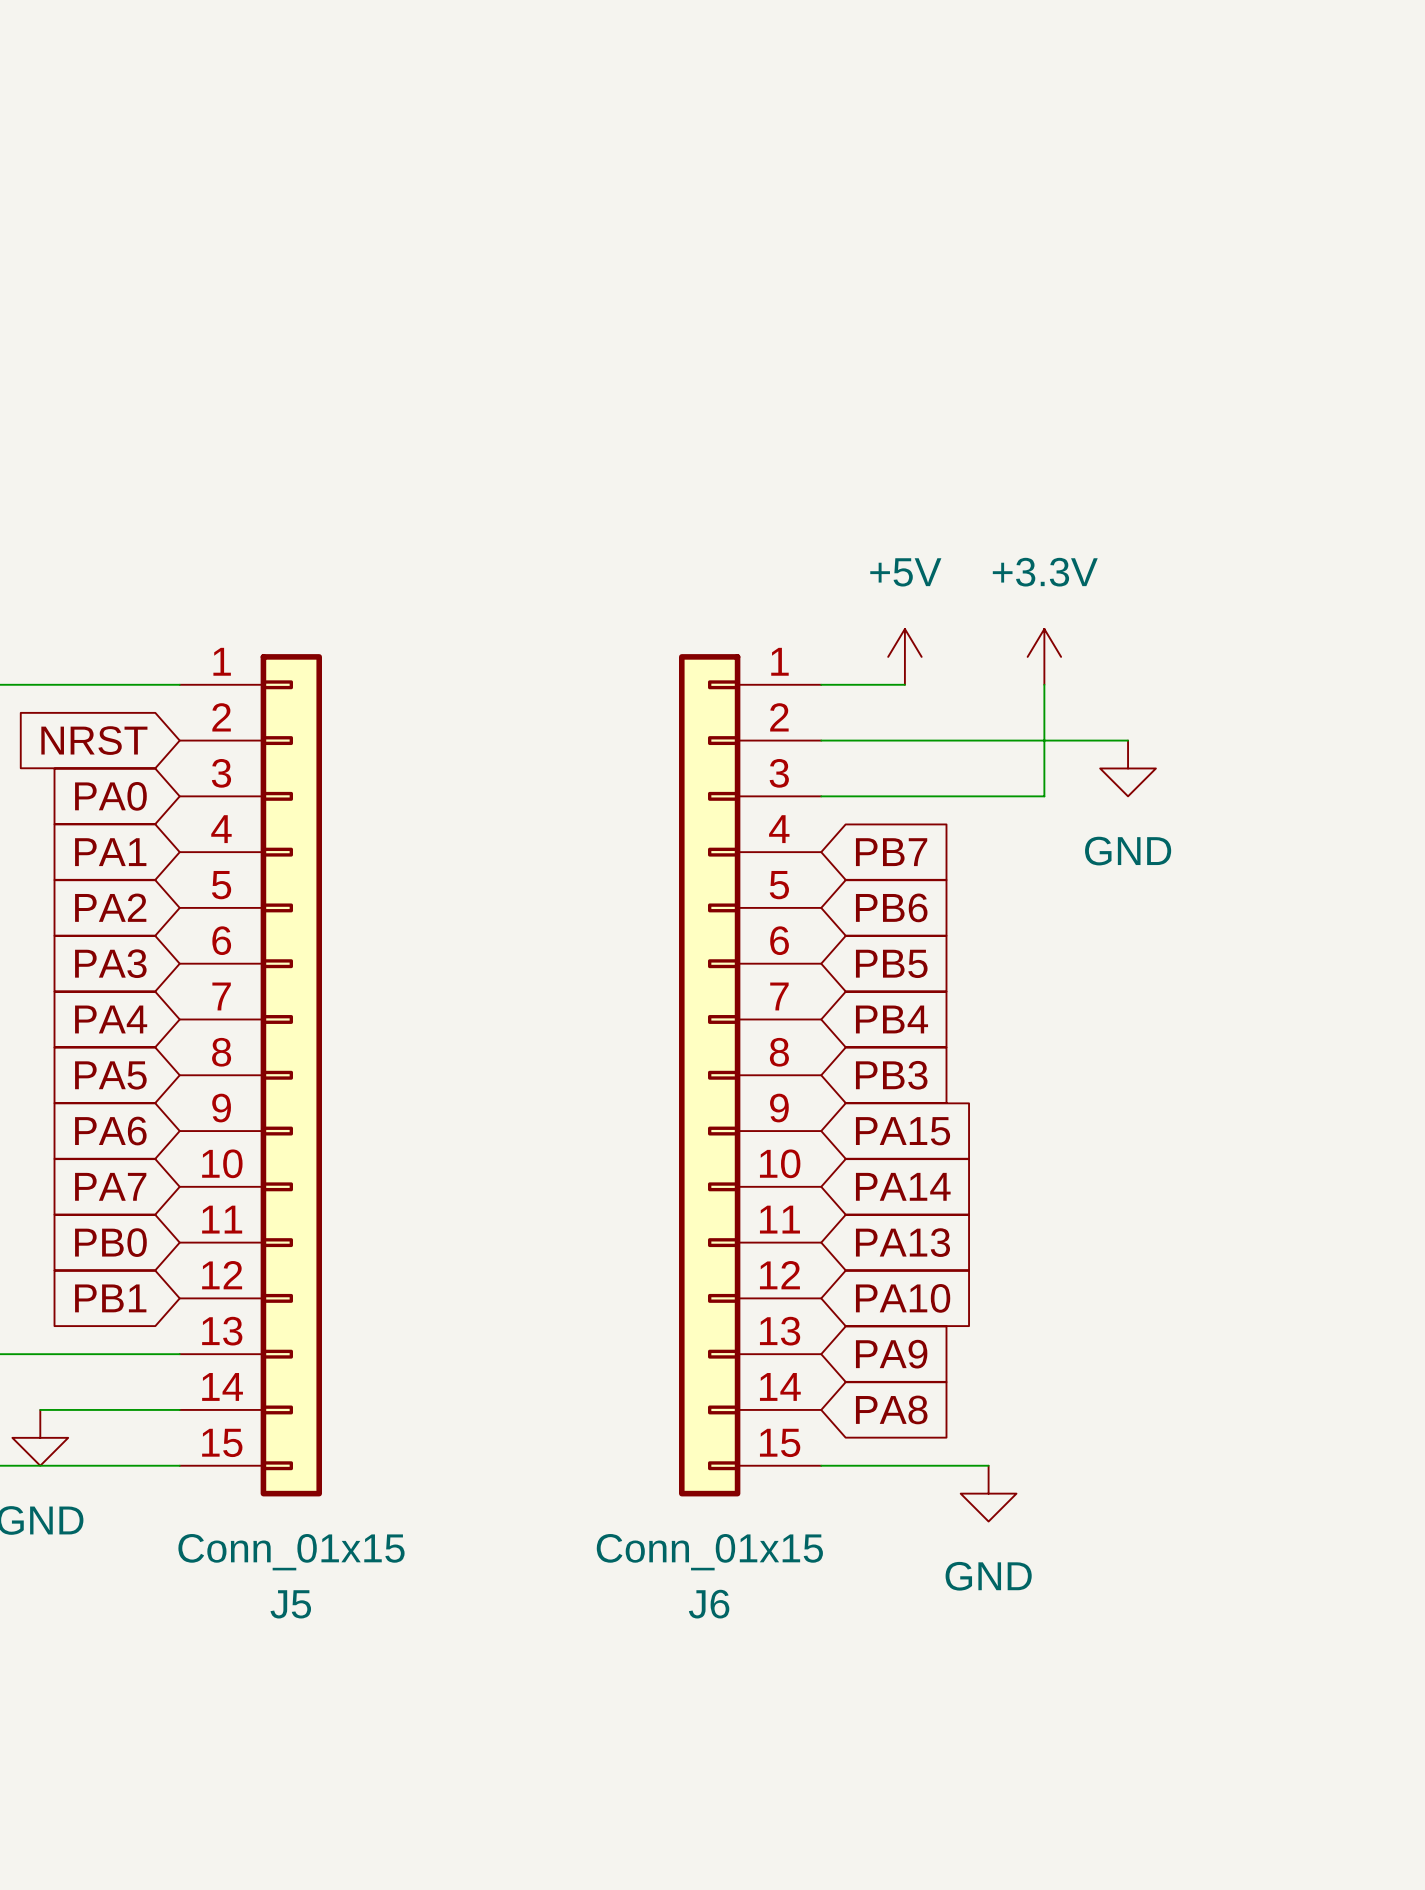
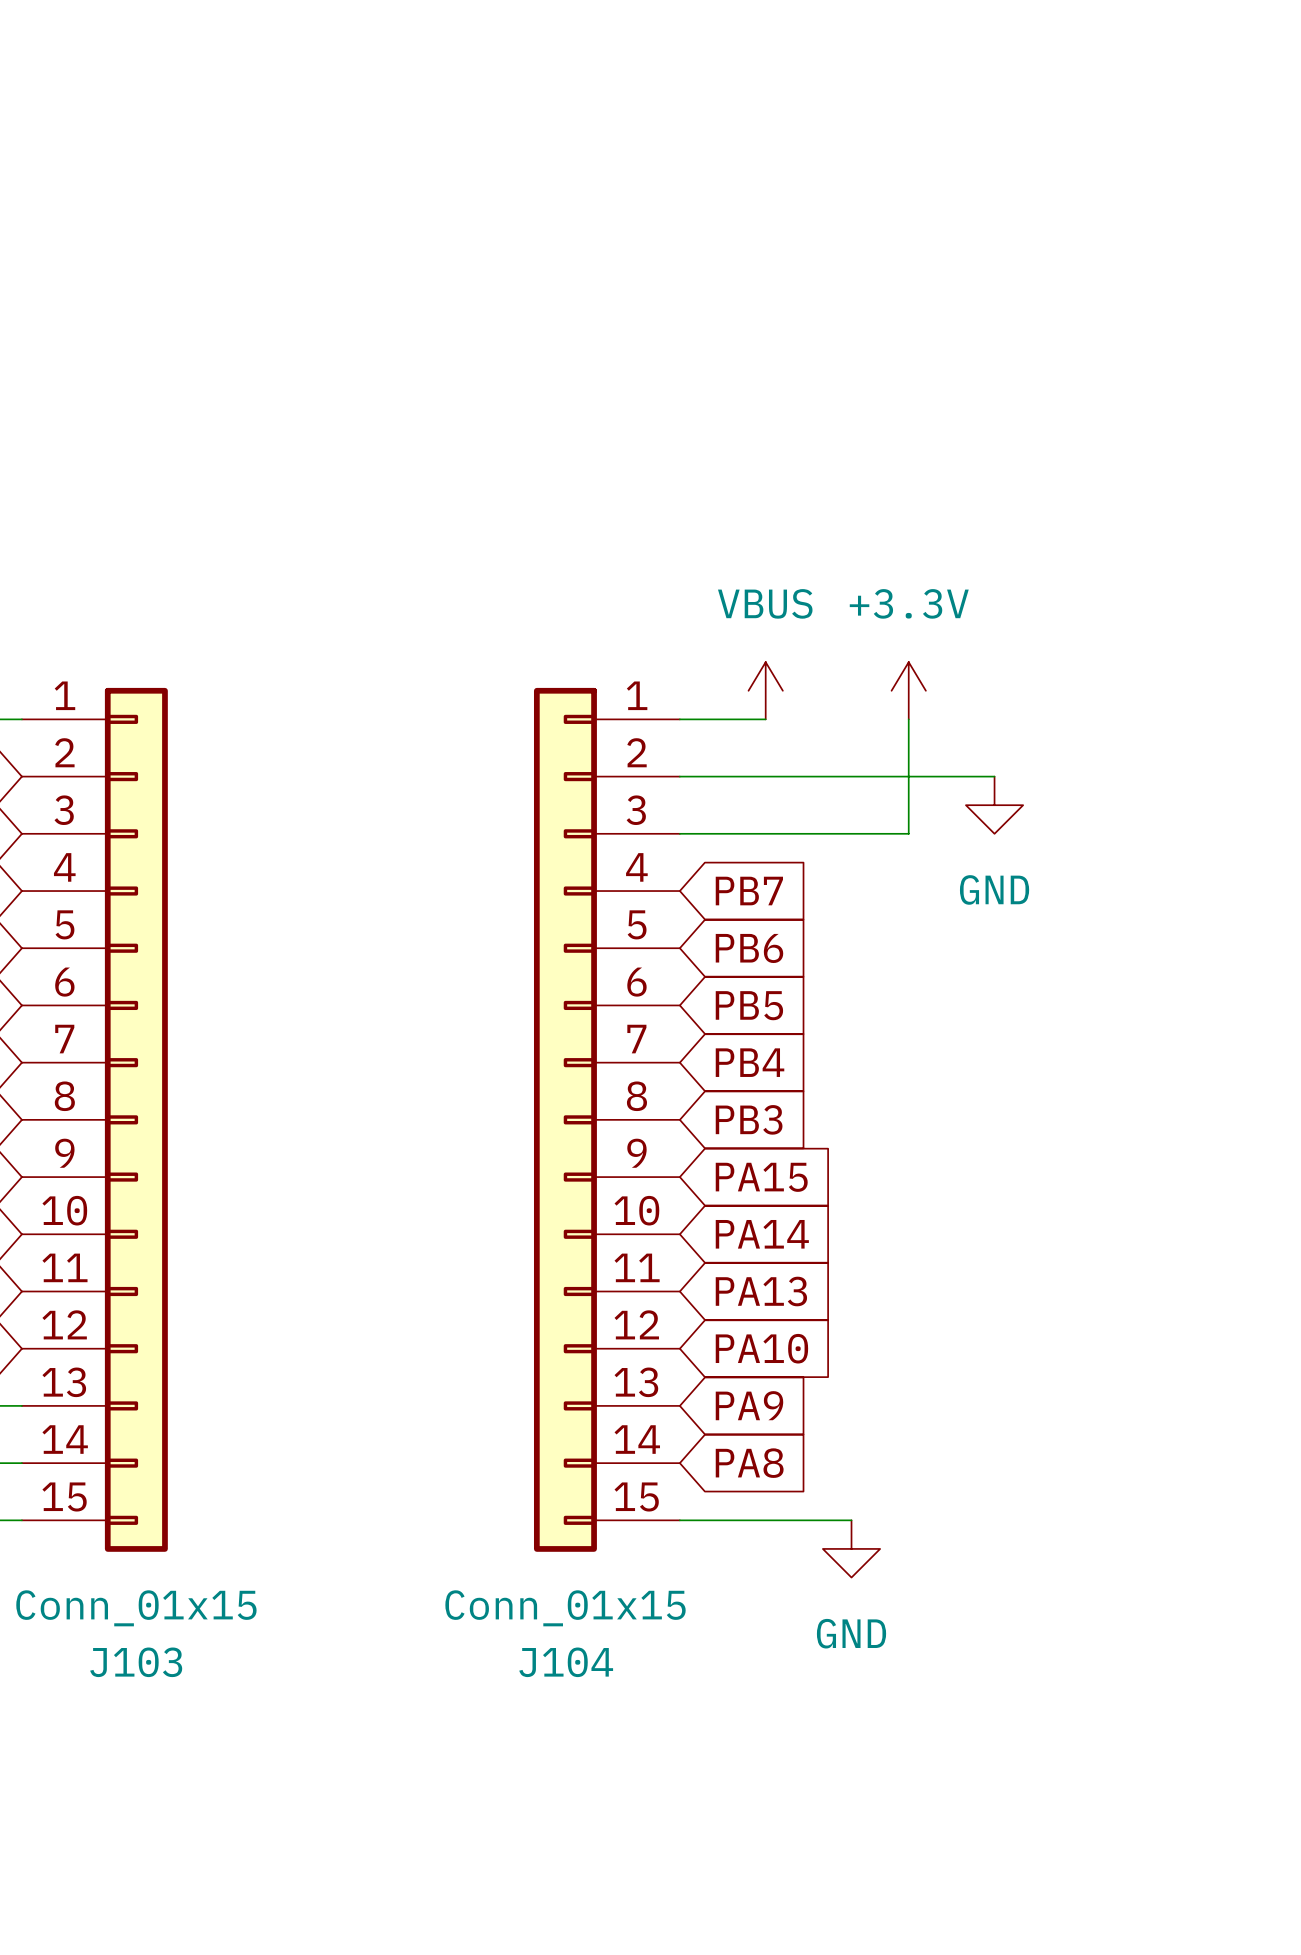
power symbol: +5V (904, 656) -> VBUS (765, 690)
J5 name: J5 (290, 1604) -> J103 (136, 1662)
J6 name: J6 (709, 1604) -> J104 (566, 1662)

